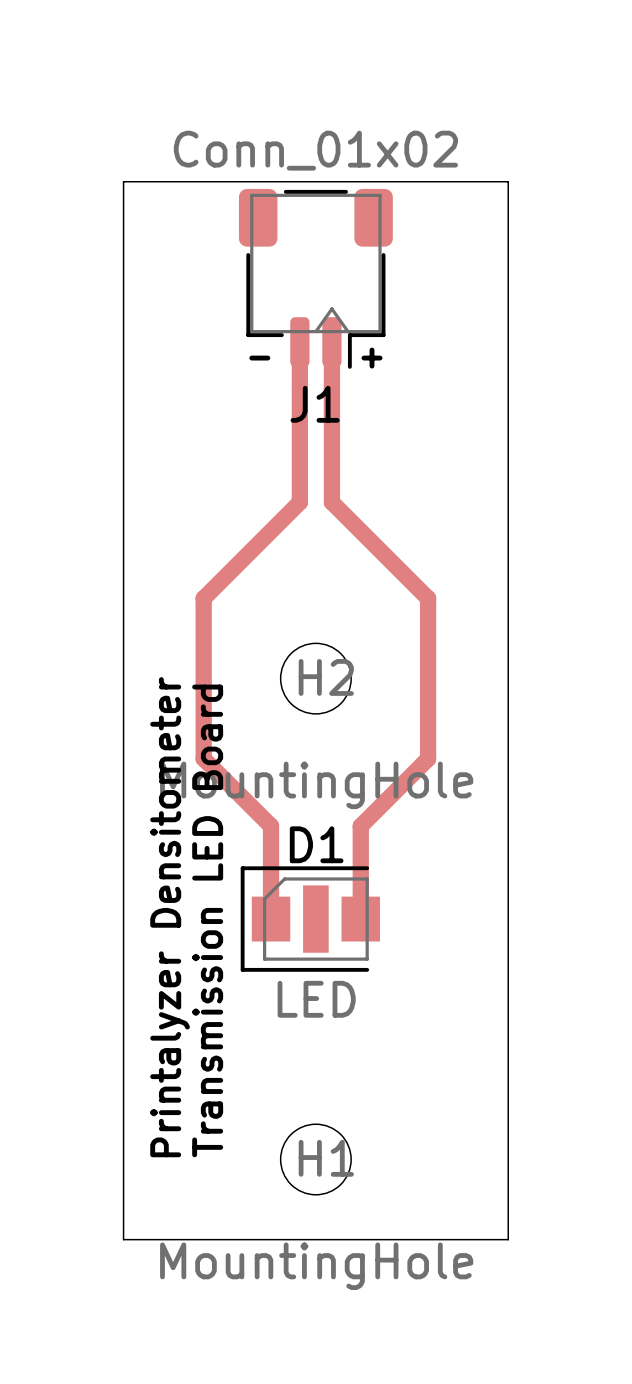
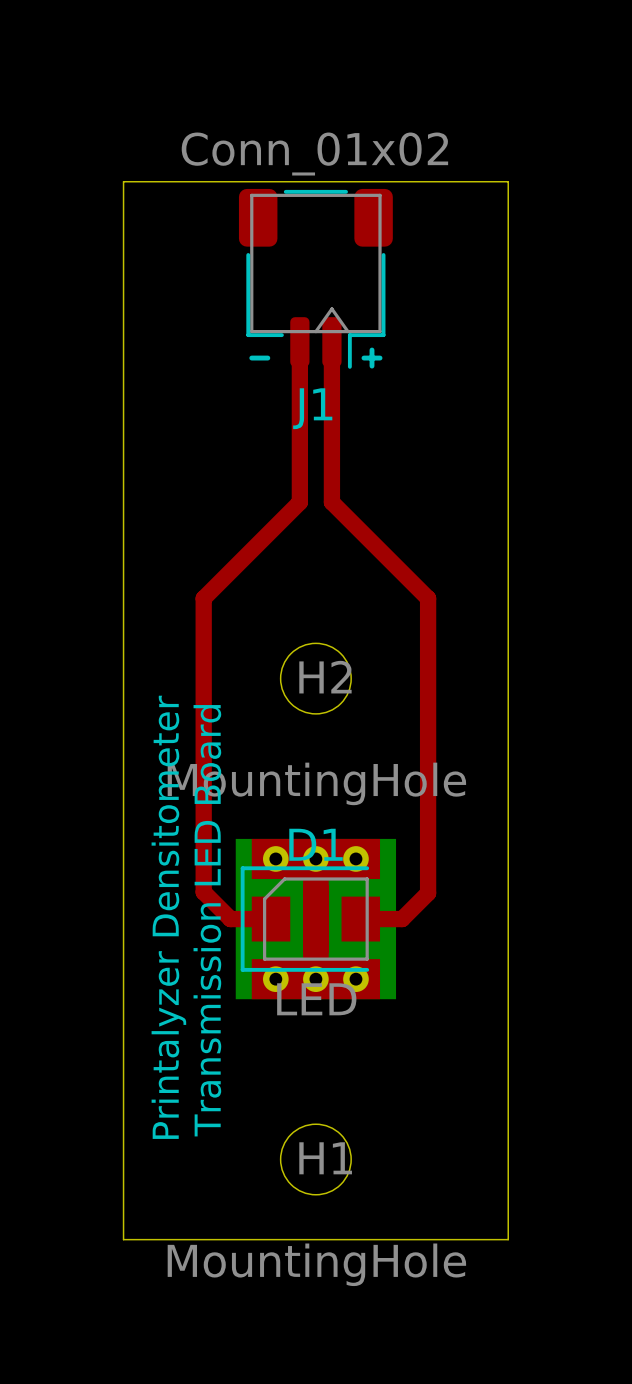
top track: (203, 758) (271, 826) (271, 919) -> (203, 758) (203, 892) (230, 919) (271, 919)
top track: (428, 758) (360, 826) (360, 919) -> (428, 758) (428, 893) (402, 919) (360, 919)
D1 footprint: [240, 866, 381, 972] -> [235, 838, 397, 1000]

